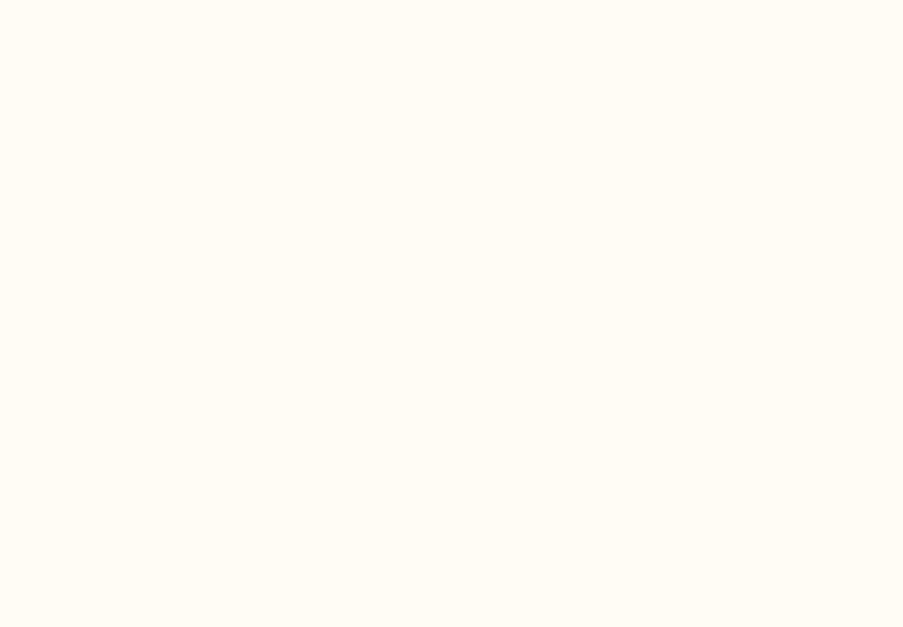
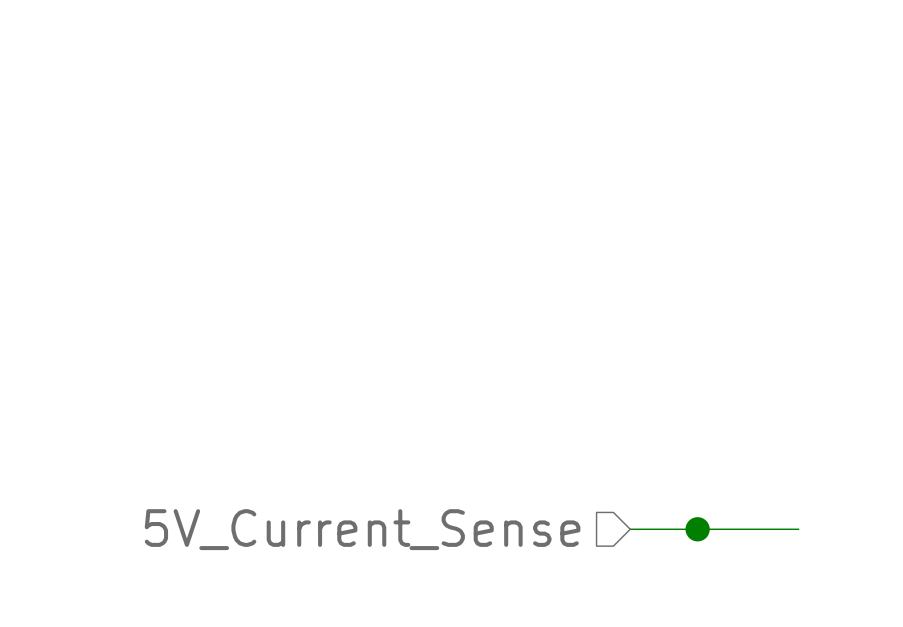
wire: none -> (630, 529) (798, 529)
junction: none -> (697, 529)
hierarchical label: none -> 5V_Current_Sense (362, 529)

